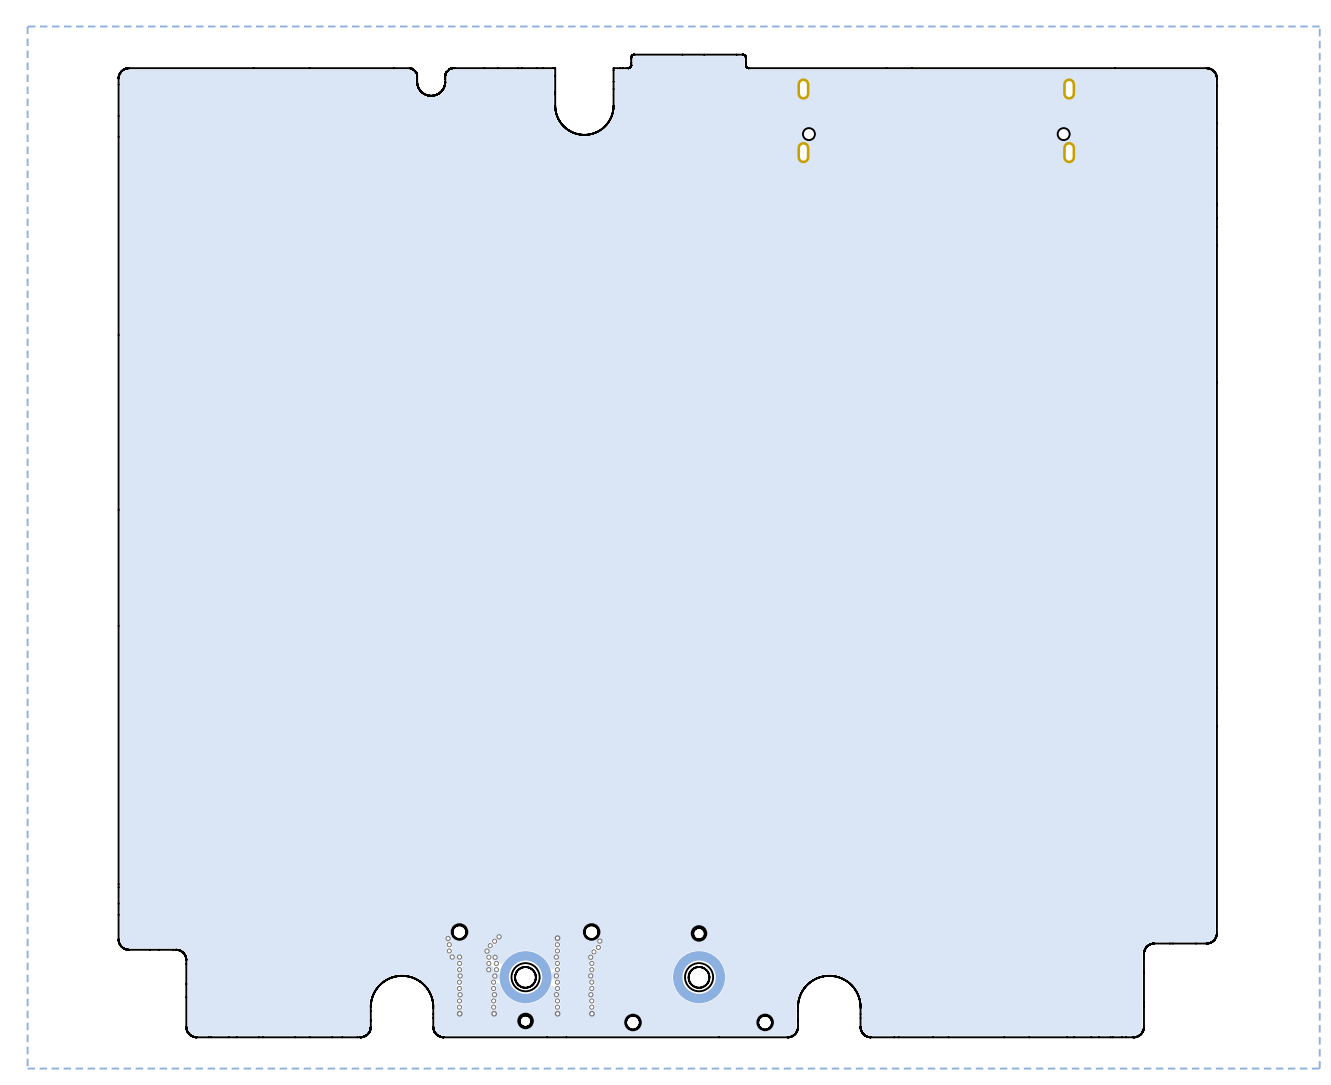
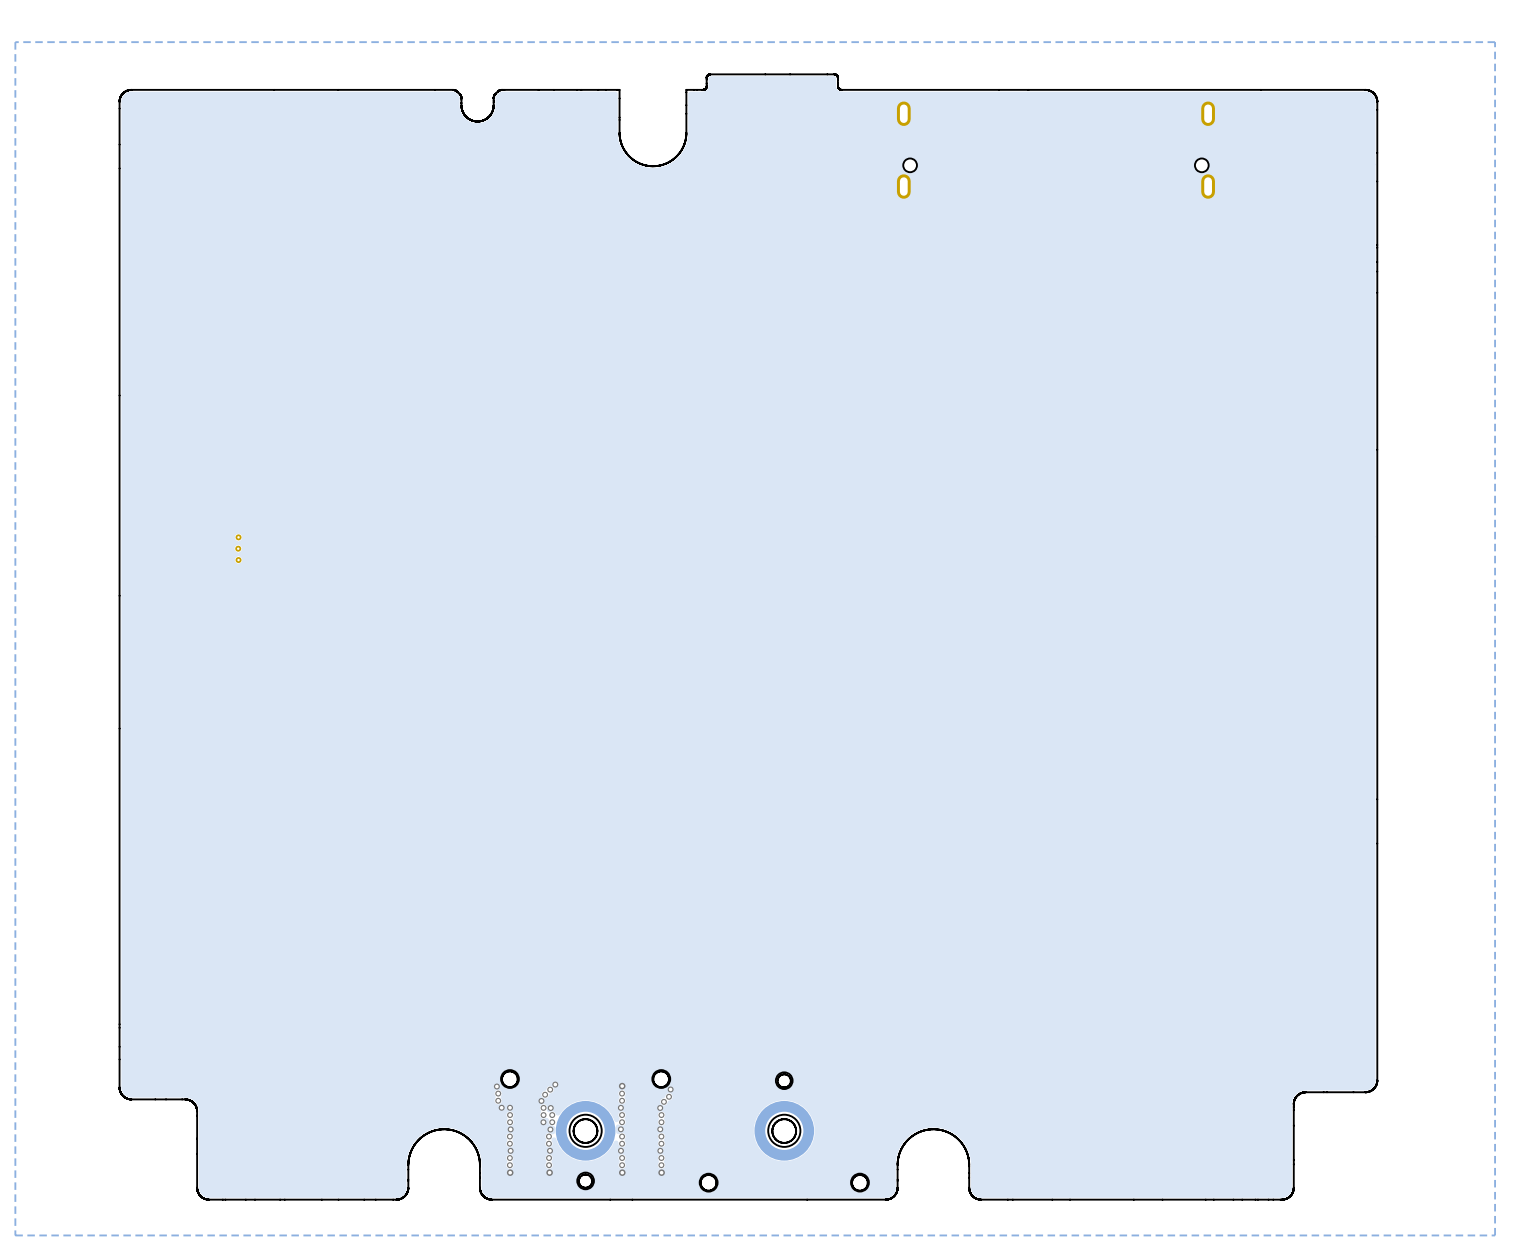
part: none -> (238, 548)

